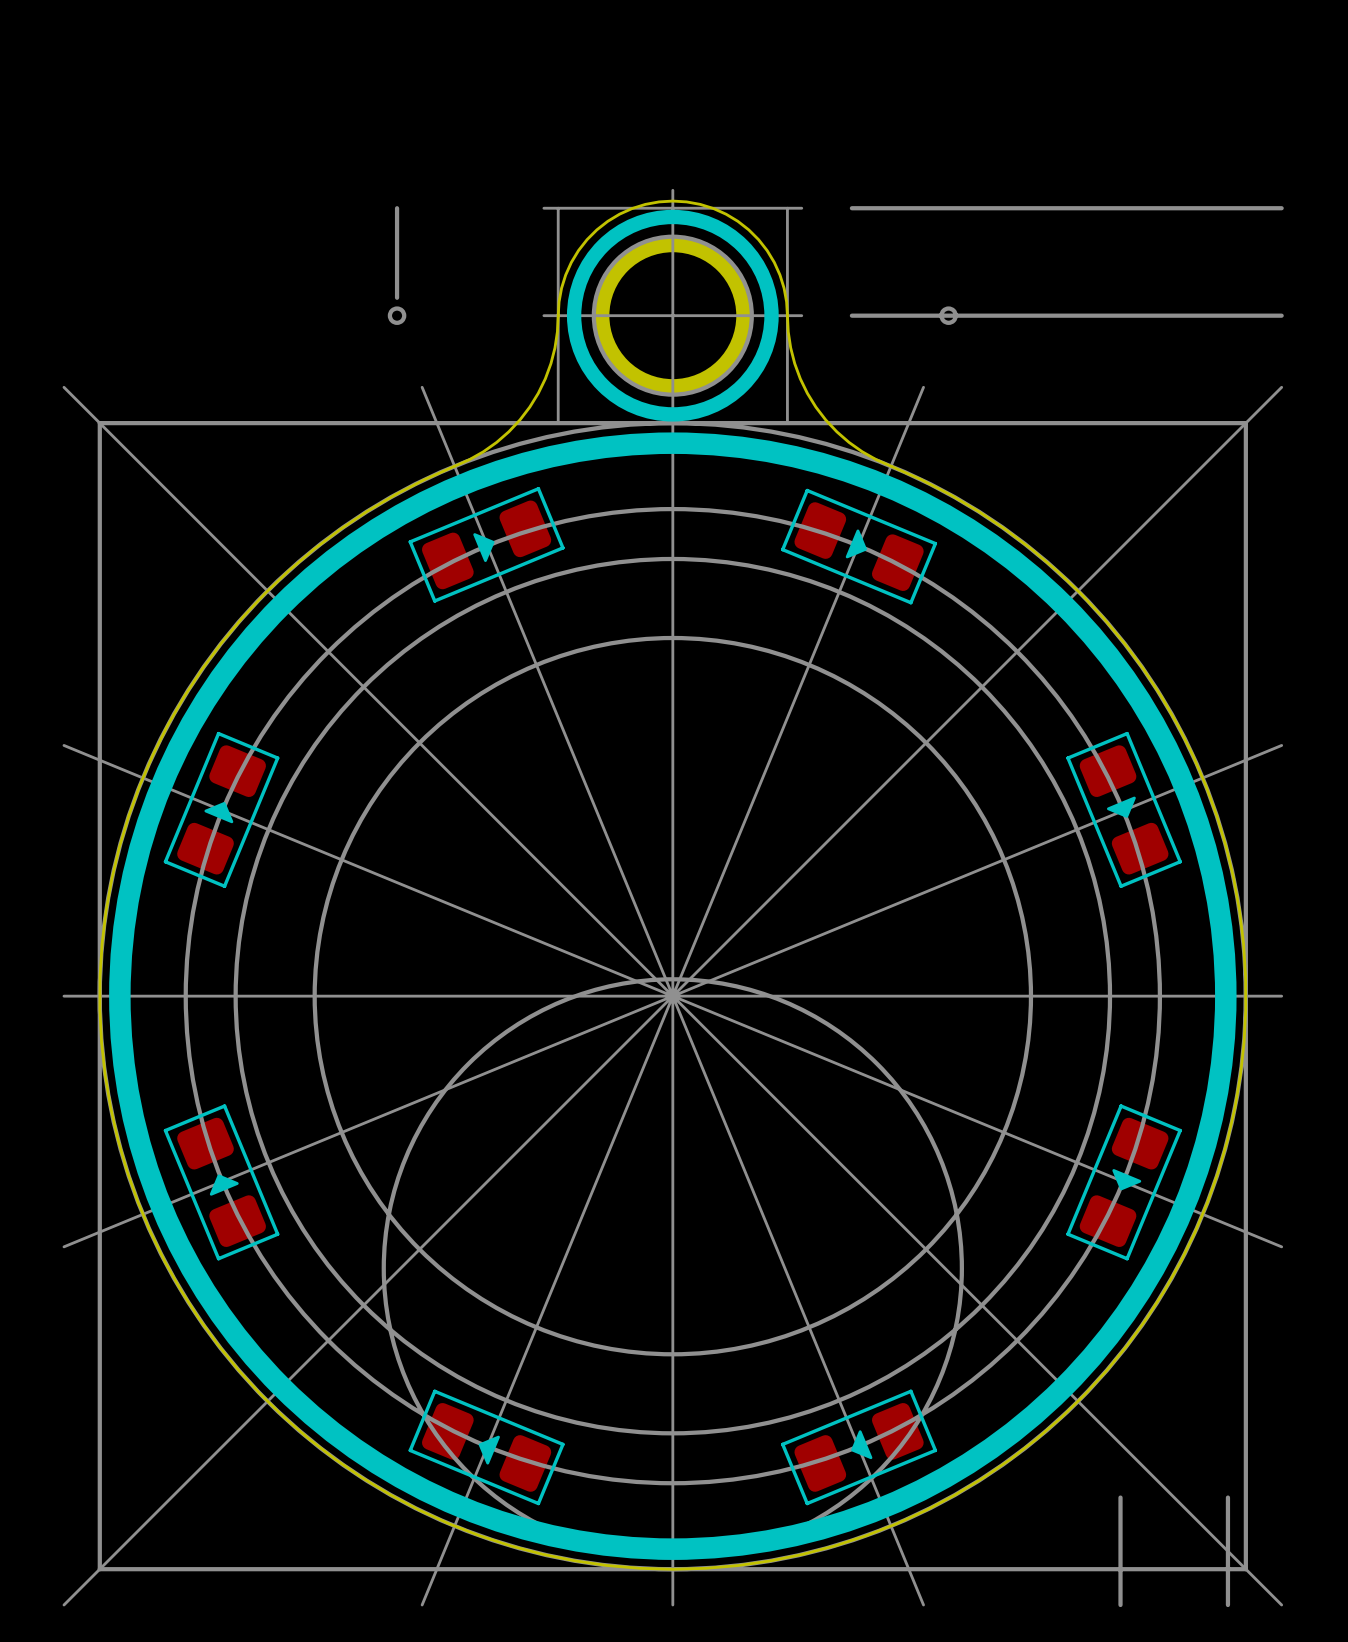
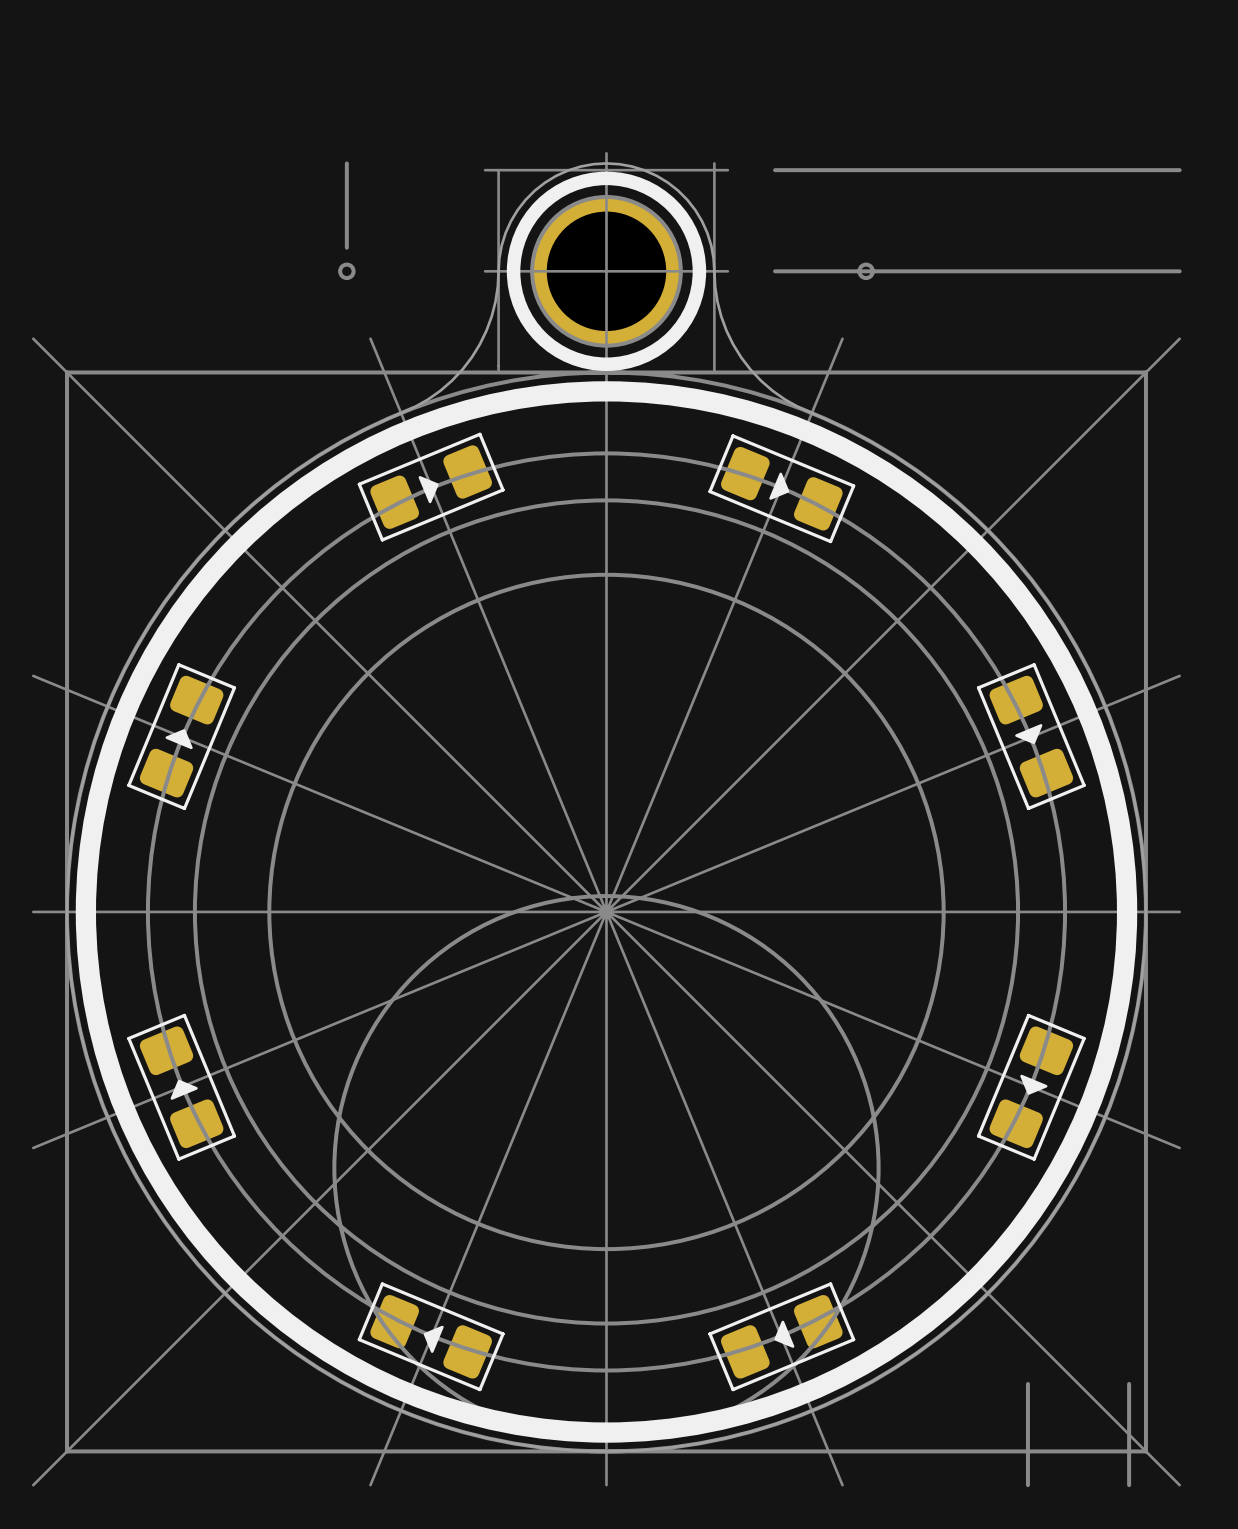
line: none -> (714, 163) (714, 170)
line: (397, 290) (397, 297) -> (346, 163) (346, 170)

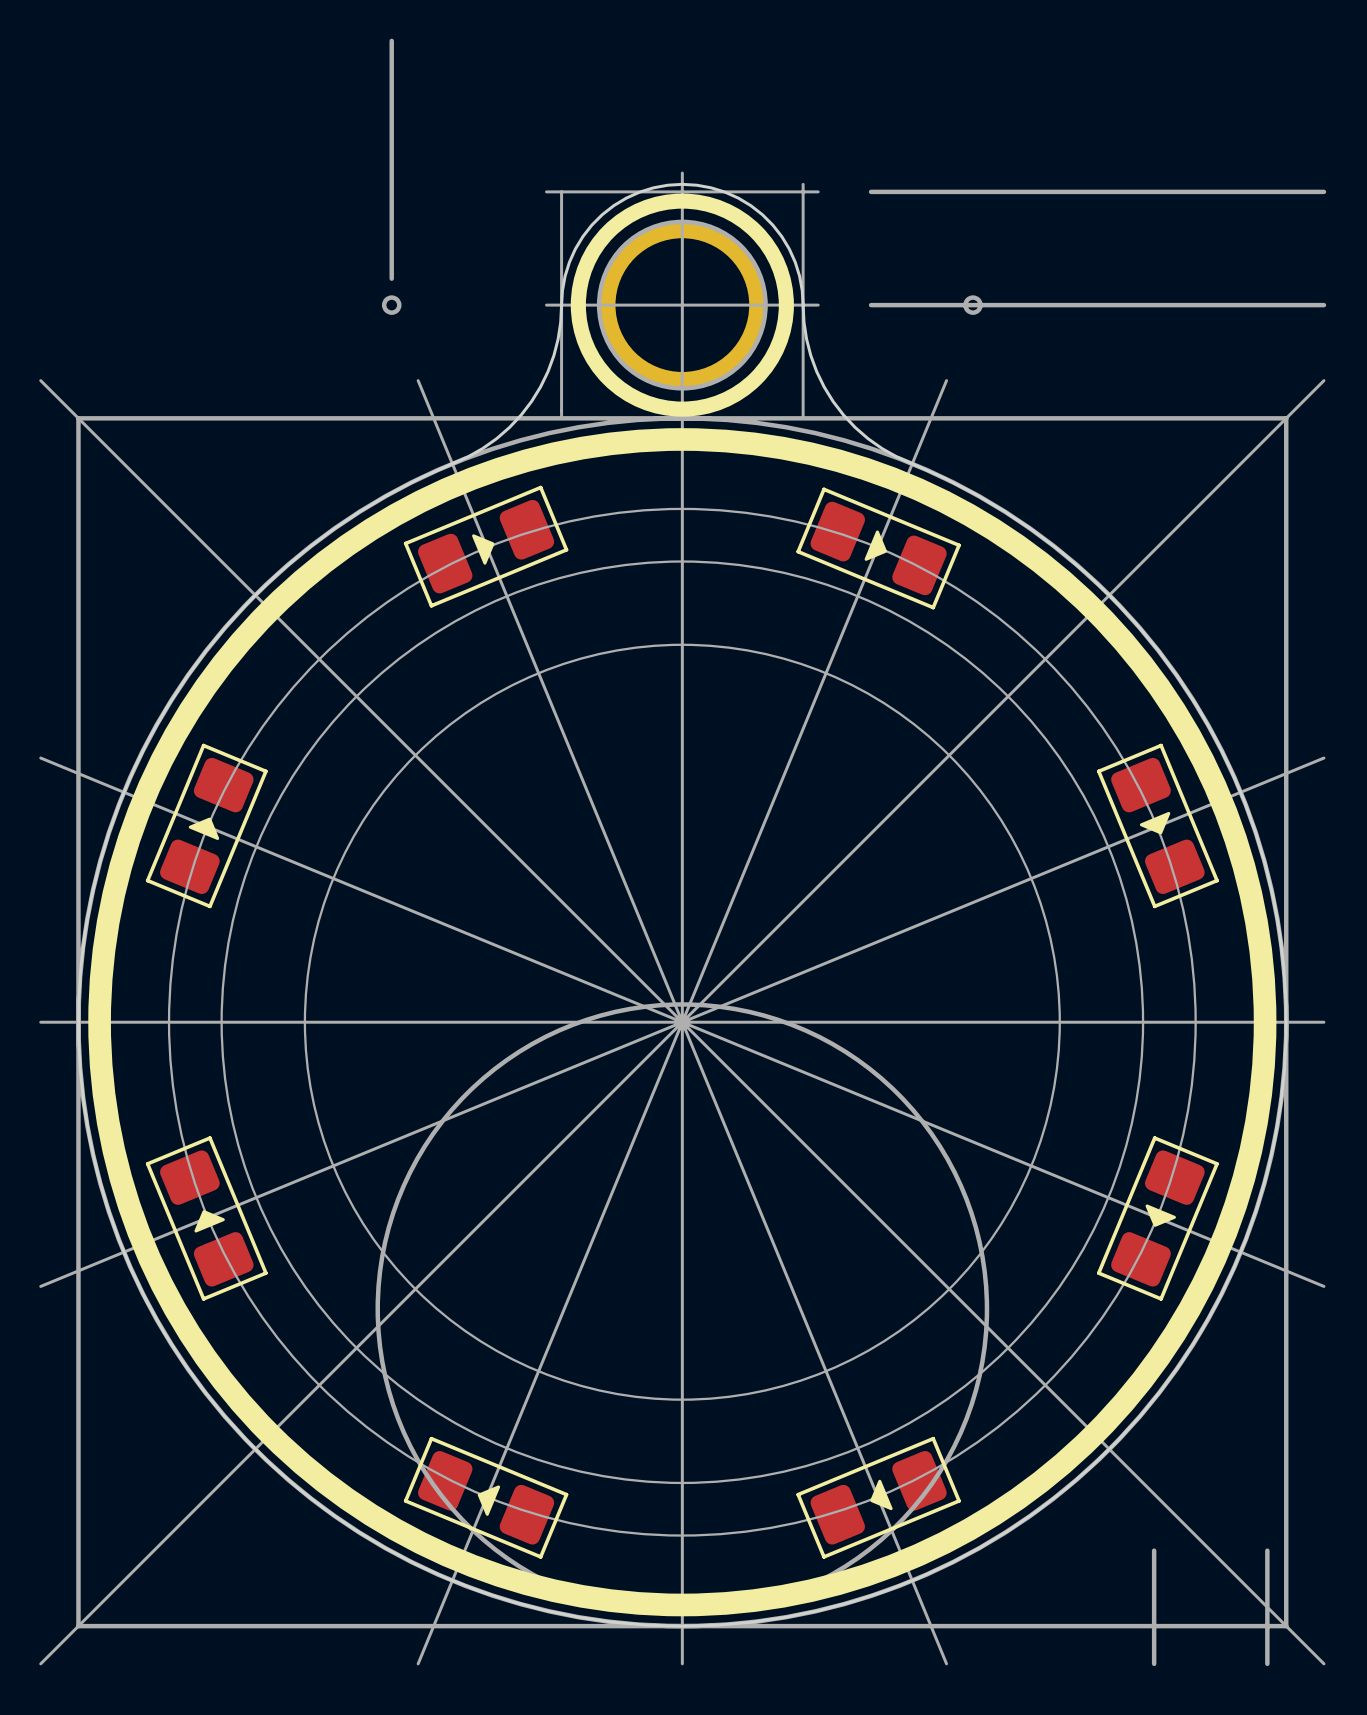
line: none -> (391, 40) (391, 184)
drawing: [145, 451, 1068, 1373] -> none
drawing: none -> [167, 507, 1197, 1537]

